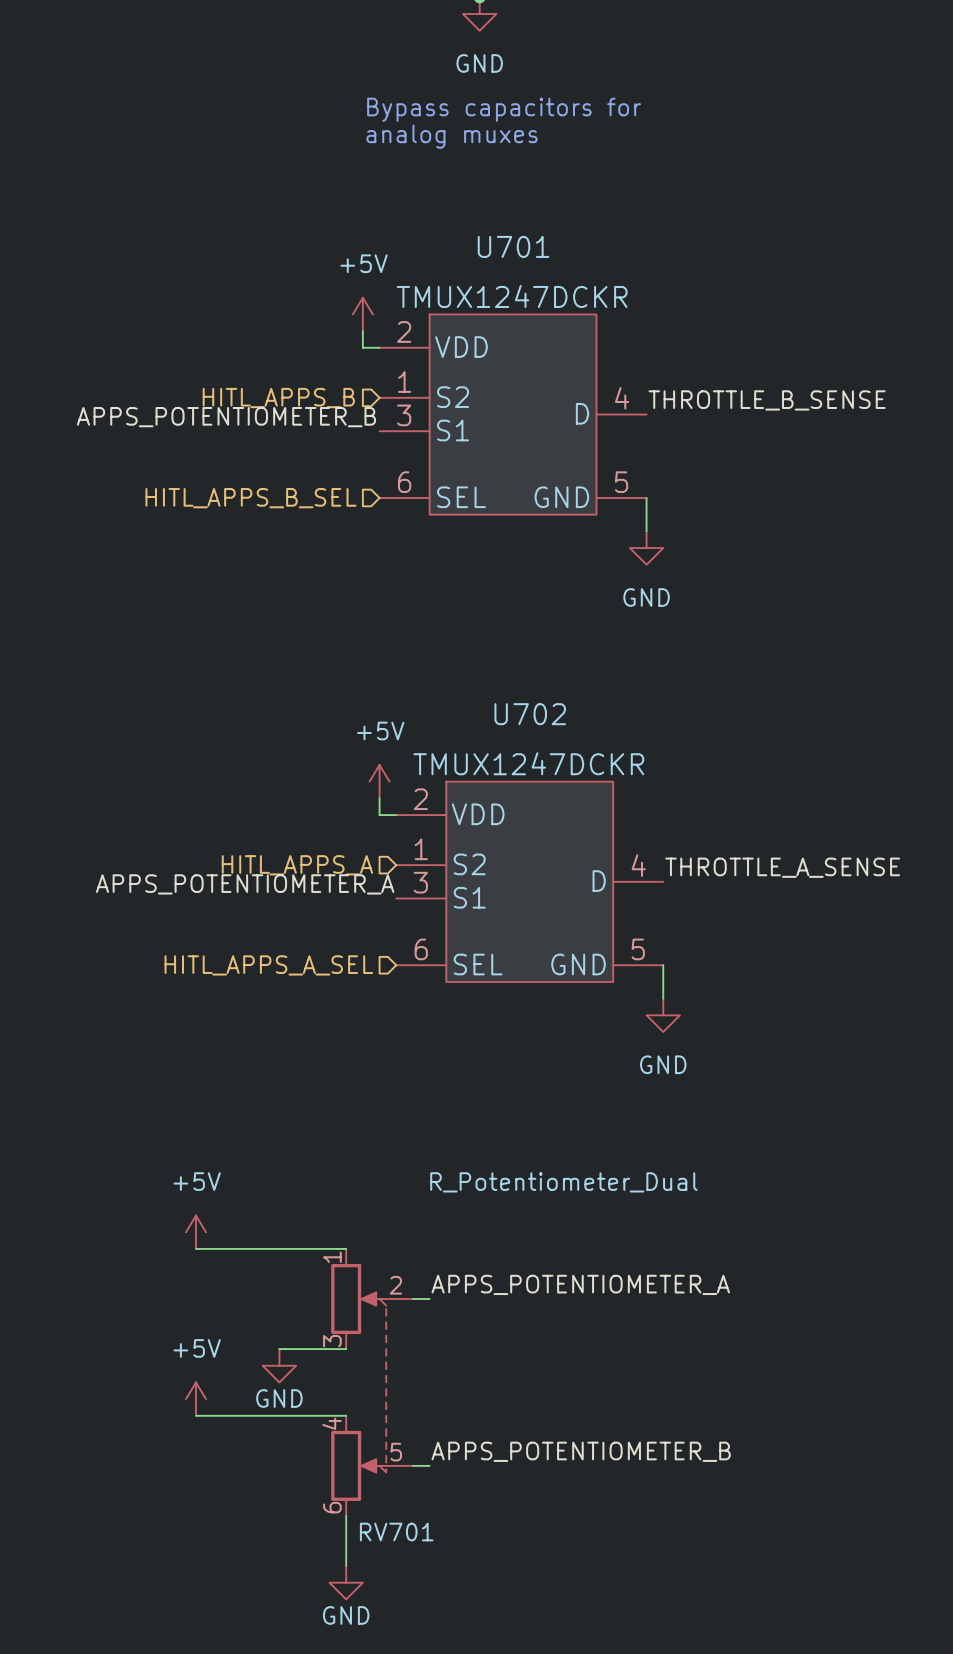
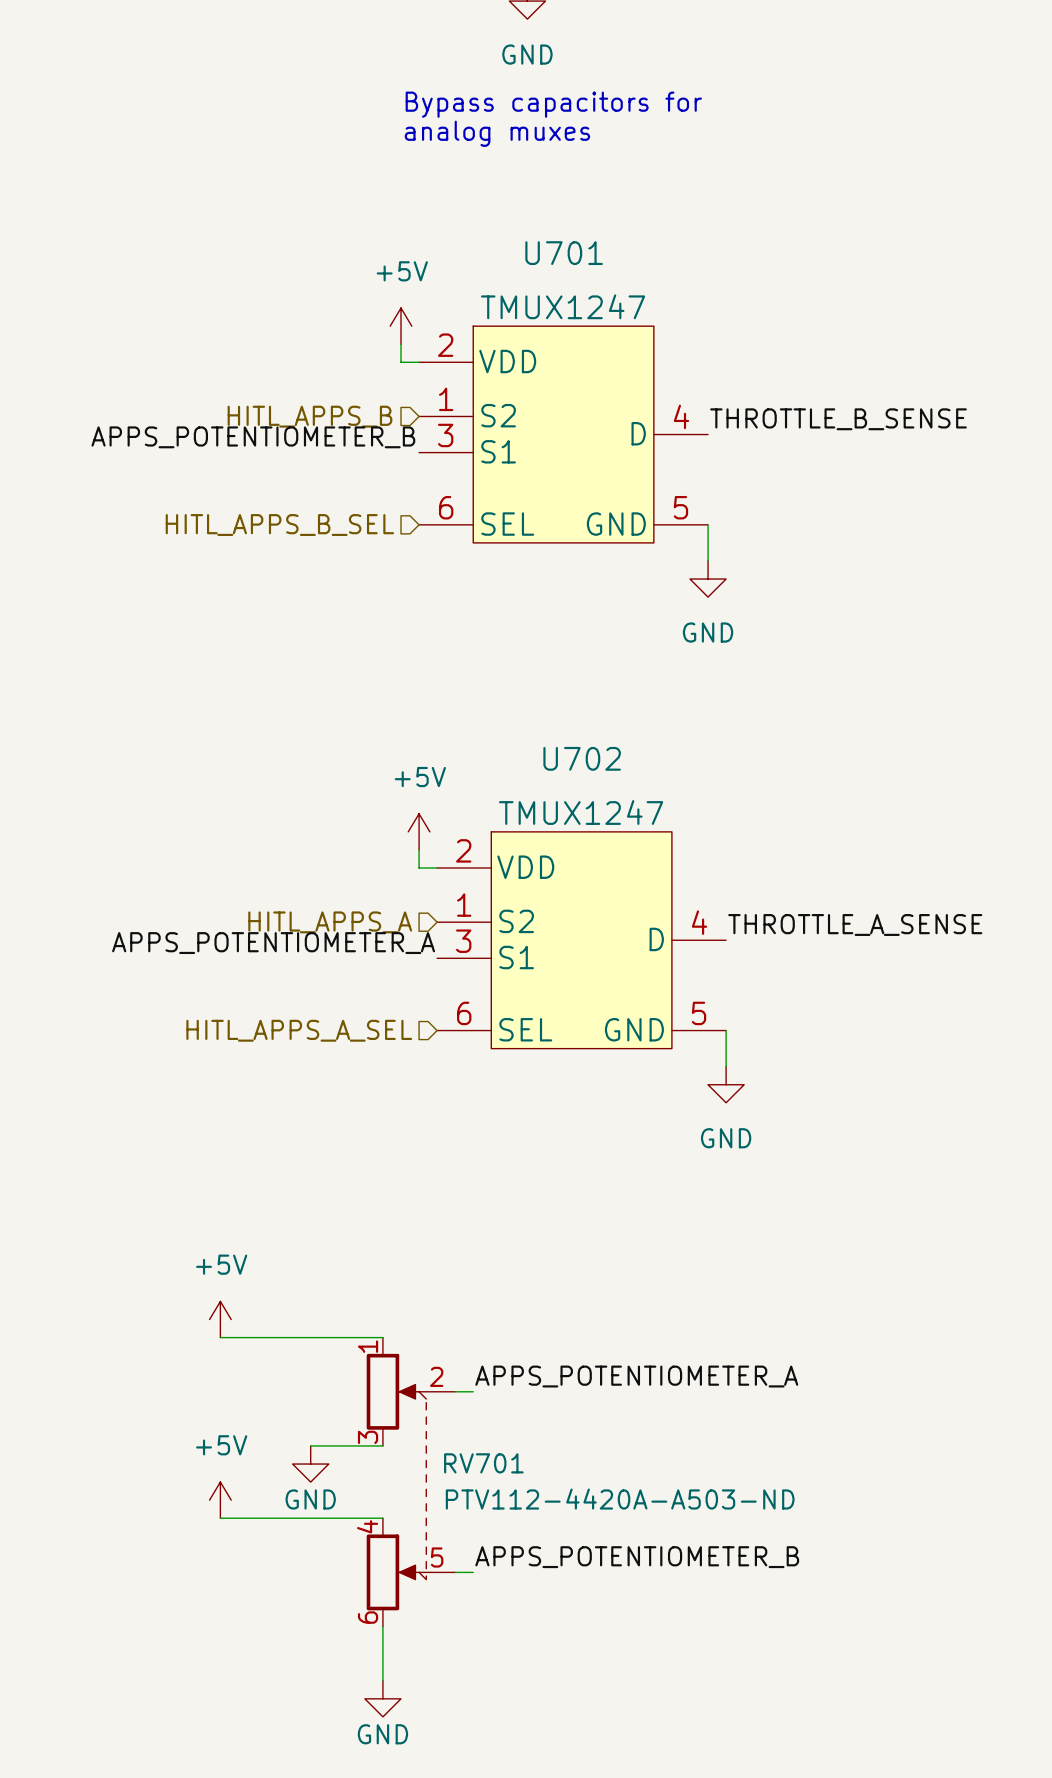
U701 value: TMUX1247DCKR (512, 296) -> TMUX1247 (563, 306)
U702 value: TMUX1247DCKR (528, 763) -> TMUX1247 (581, 812)
RV701 value: R_Potentiometer_Dual (563, 1182) -> PTV112-4420A-A503-ND (620, 1499)
RV701 name position: RV701 (396, 1532) -> RV701 (483, 1463)

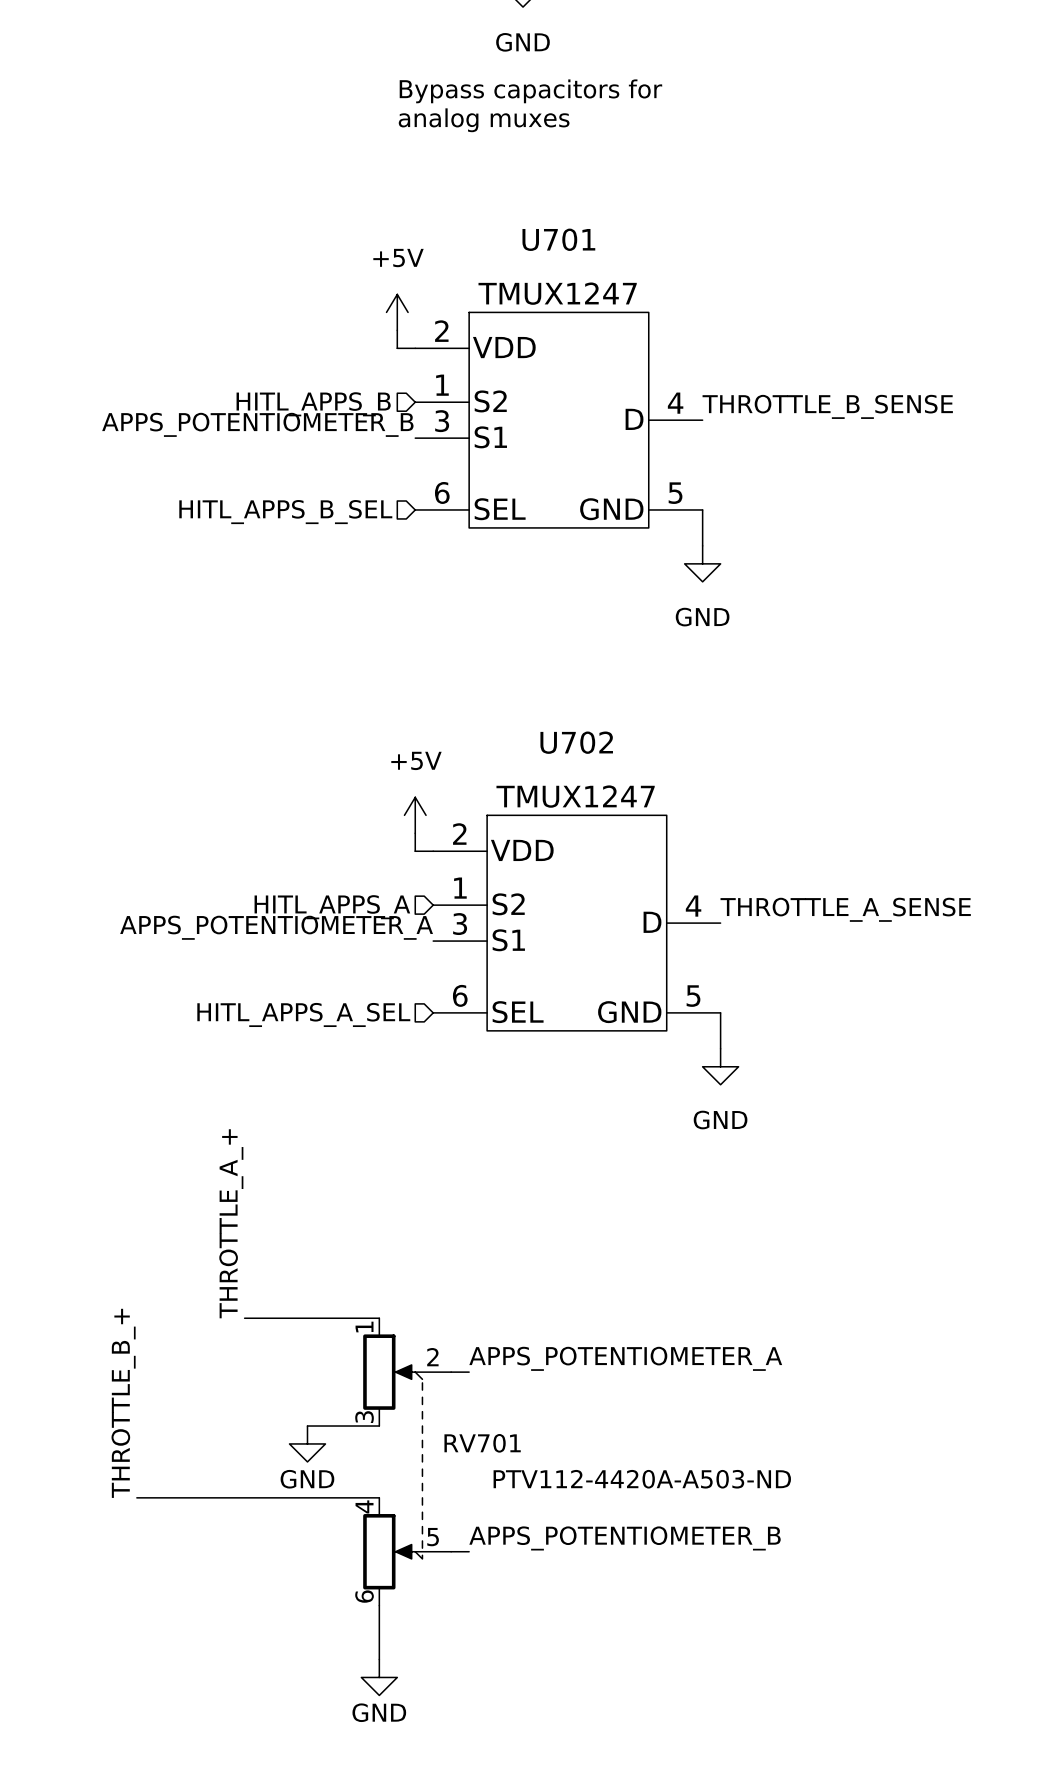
label: none -> THROTTLE_A_+ (231, 1223)
power symbol: +5V (220, 1319) -> none
wire: (220, 1337) (247, 1337) -> none
label: none -> THROTTLE_B_+ (123, 1403)
power symbol: +5V (220, 1500) -> none
wire: none -> (136, 1497) (217, 1497)

